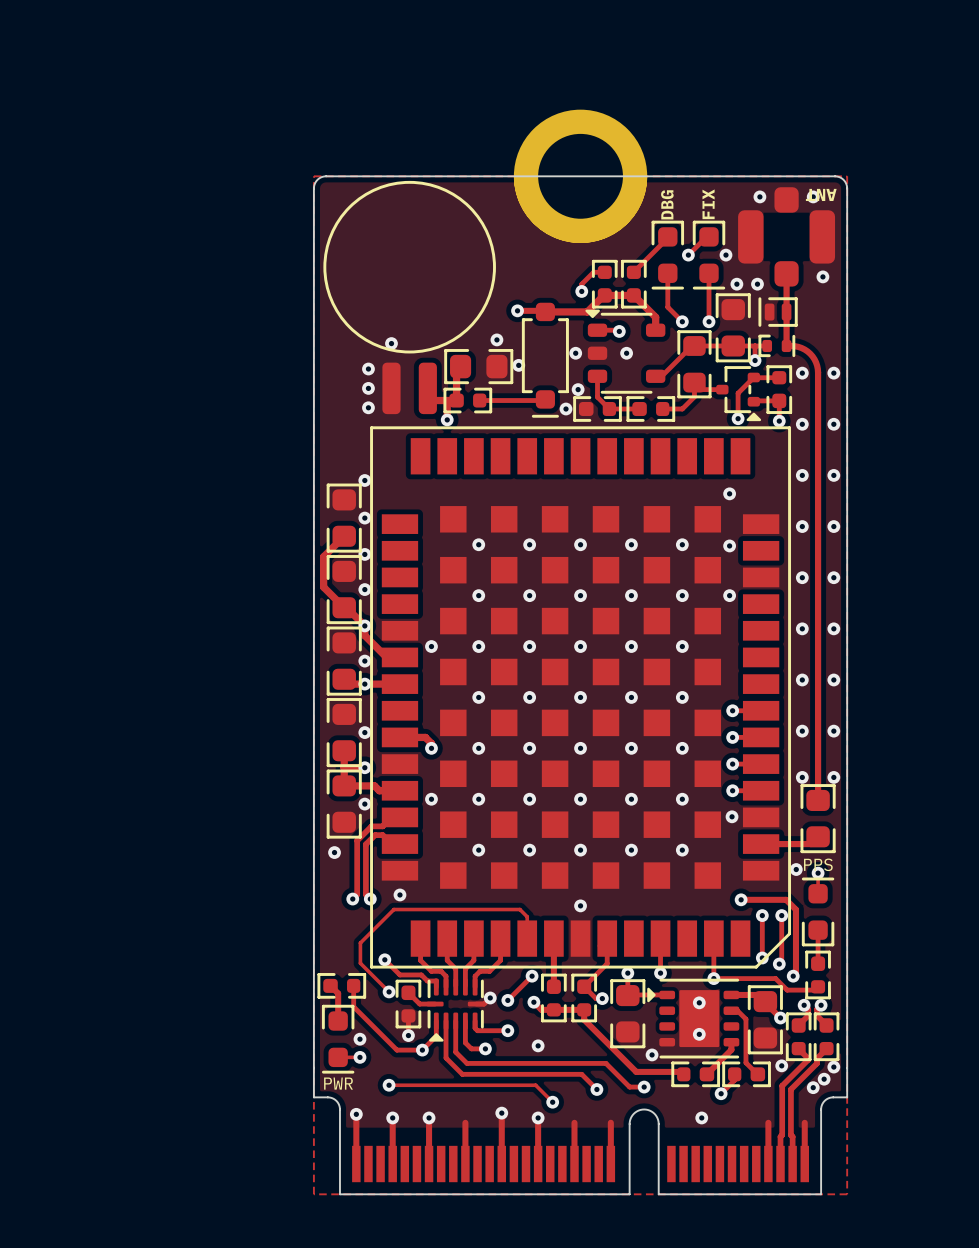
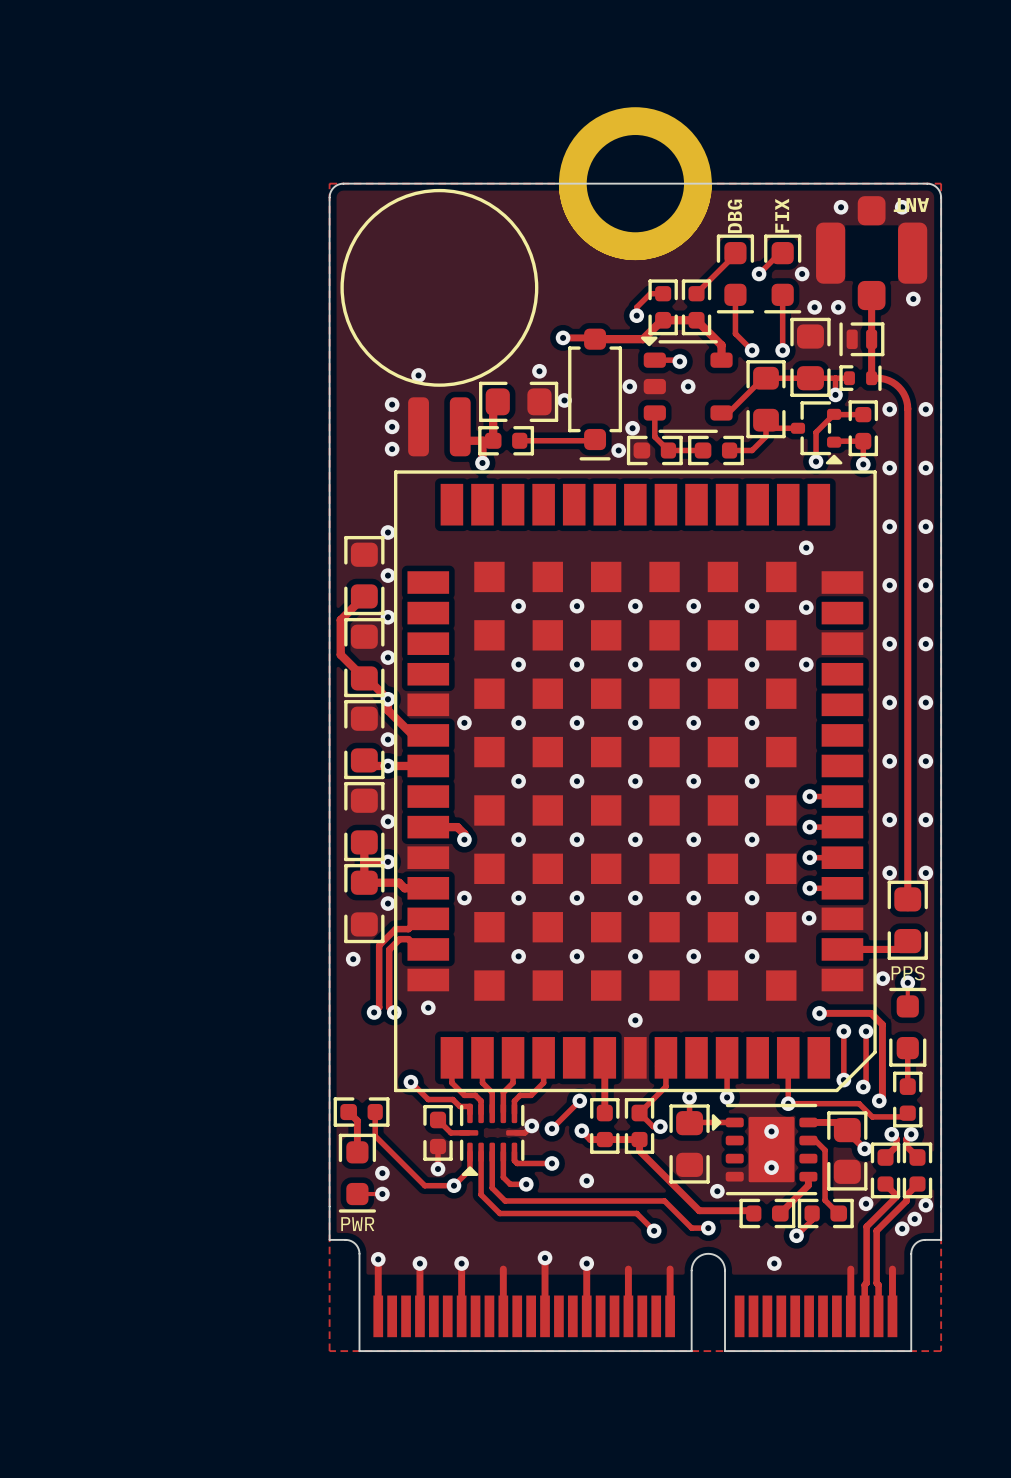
track: (527, 938) (527, 916) (519, 909) (393, 909) (360, 943) (360, 963) (389, 991) -> none
via: (389, 991) -> none
track: (389, 1085) (535, 1085) (552, 1102) -> none
via: (389, 1085) -> none
via: (552, 1102) -> none

